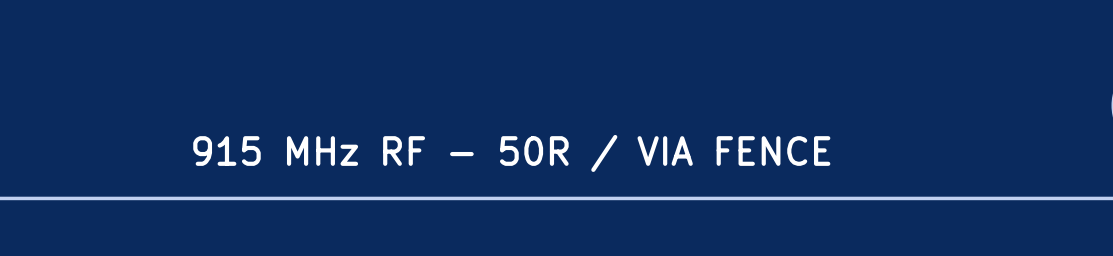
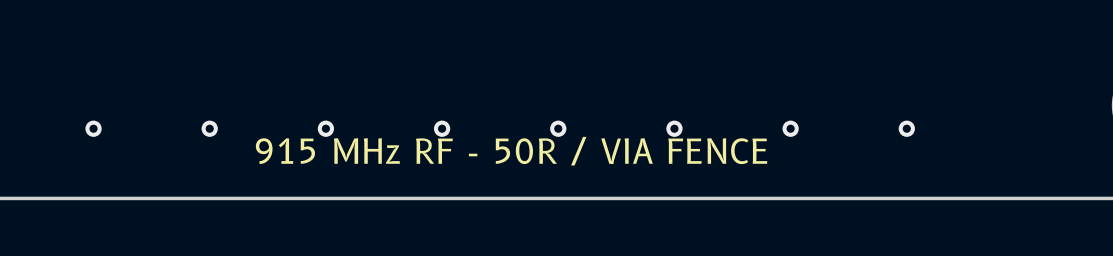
via: none -> (93, 128)
via: none -> (209, 128)
via: none -> (325, 128)
via: none -> (442, 128)
via: none -> (558, 128)
via: none -> (674, 128)
via: none -> (790, 128)
via: none -> (906, 128)

